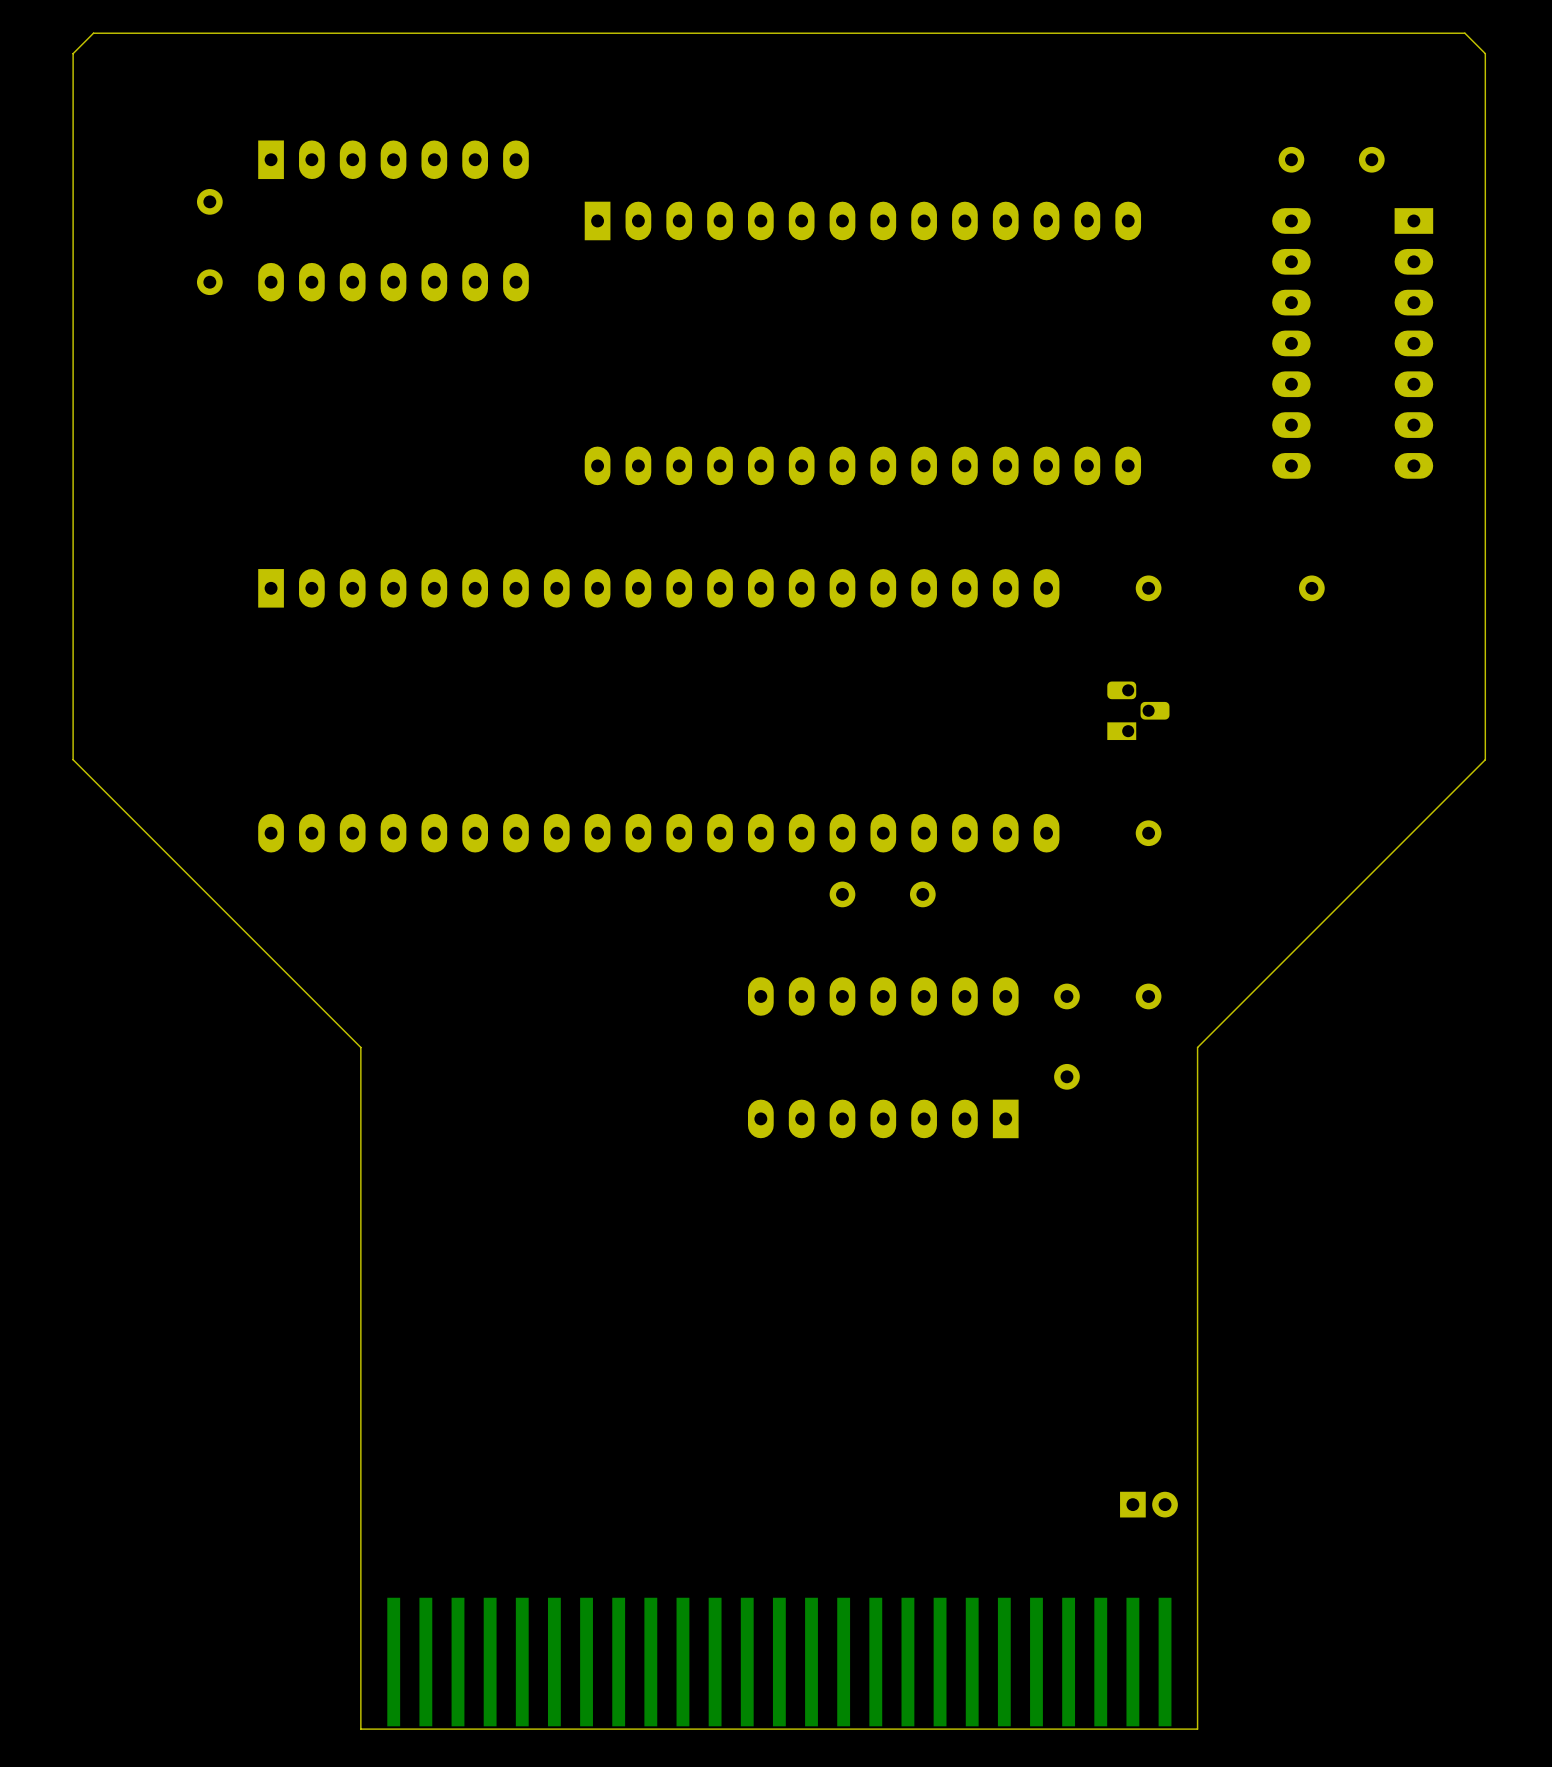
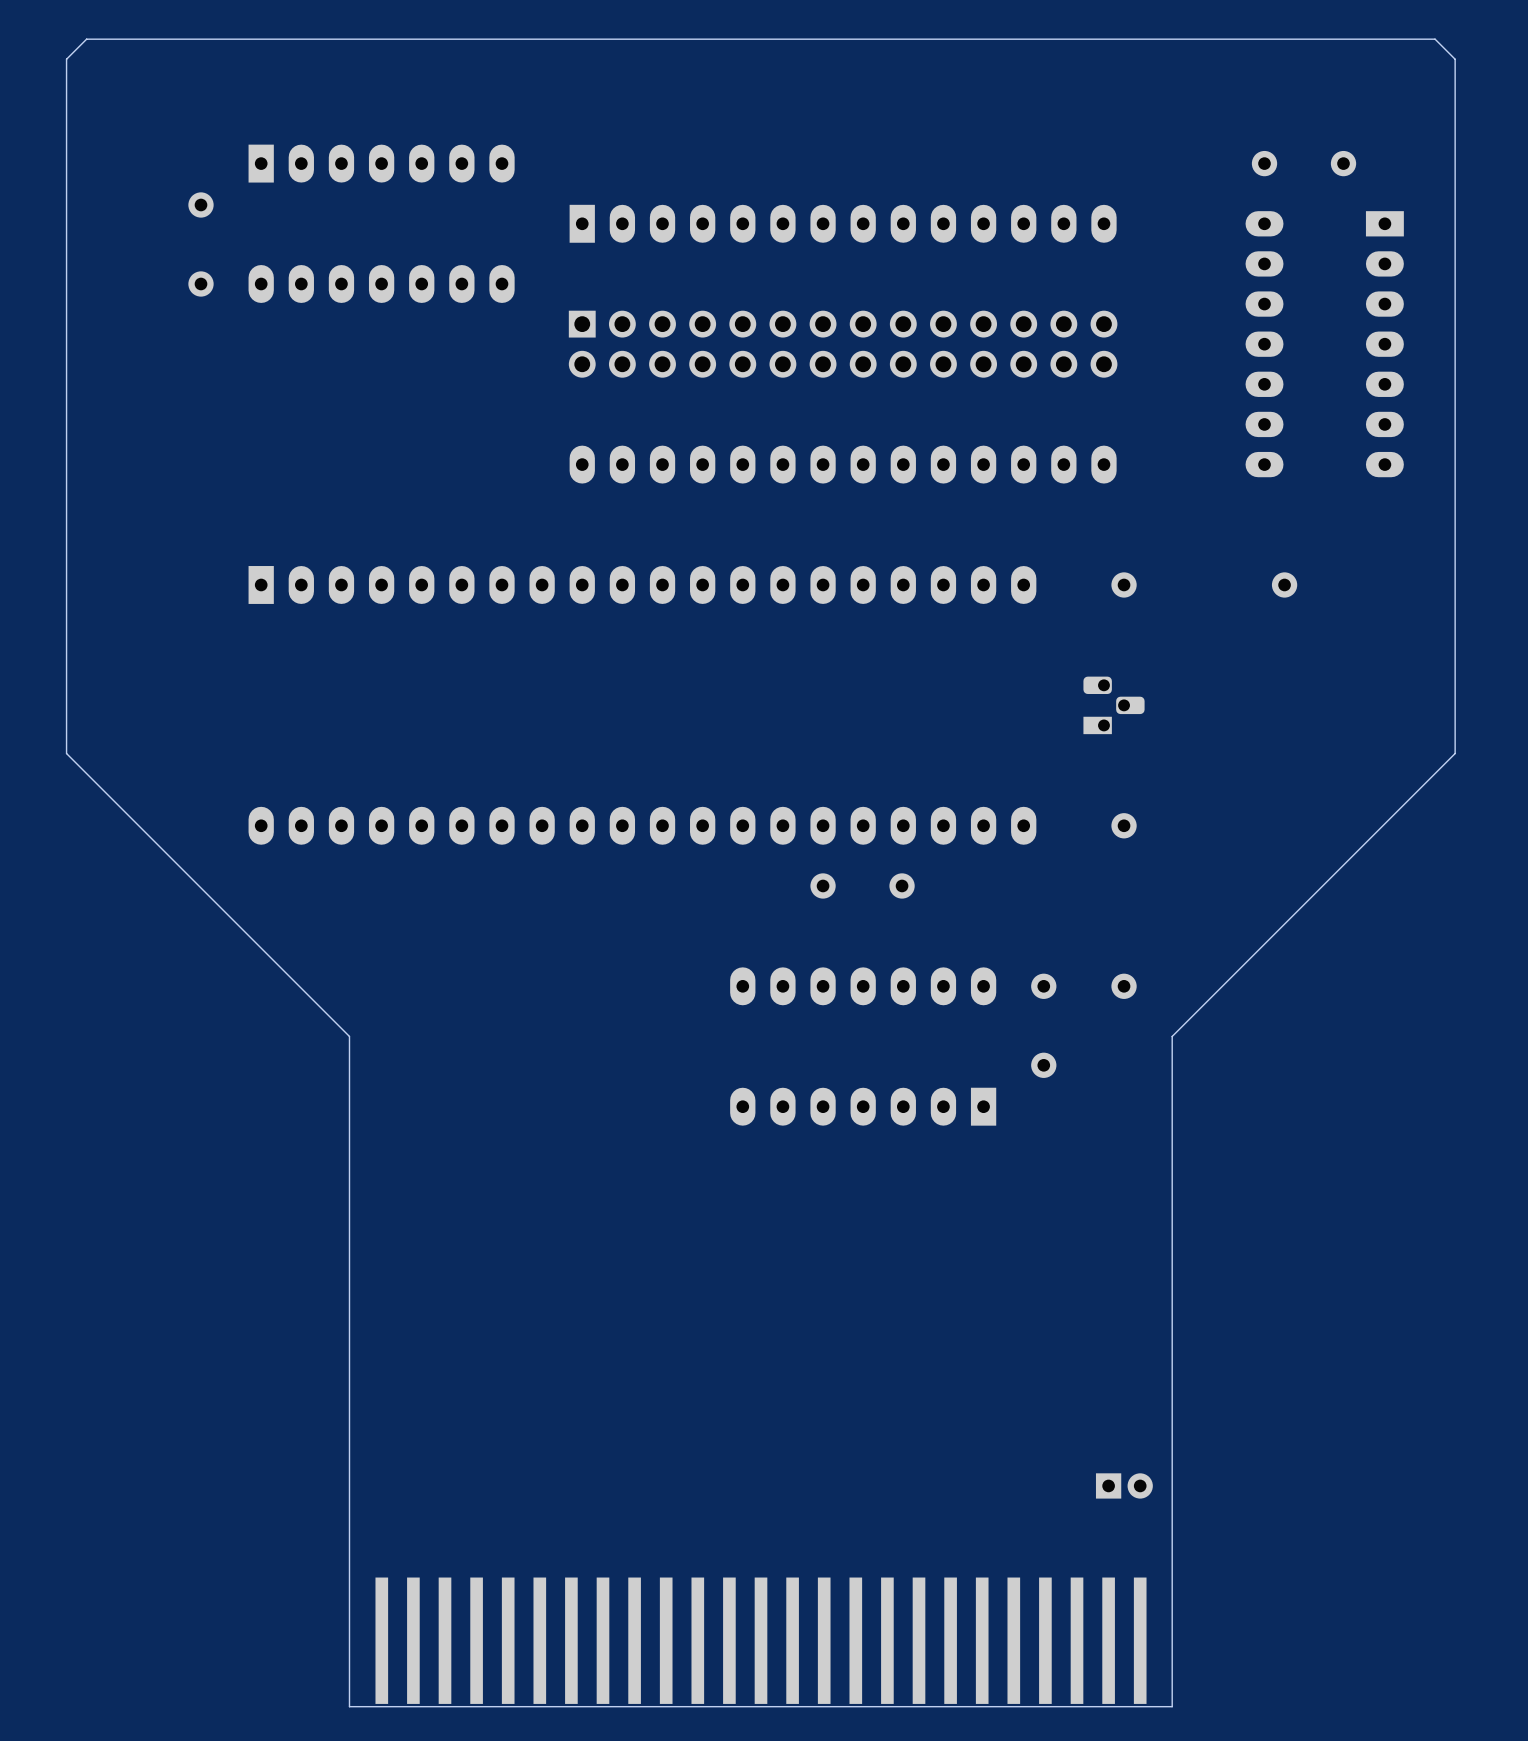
part: none -> (843, 344)

